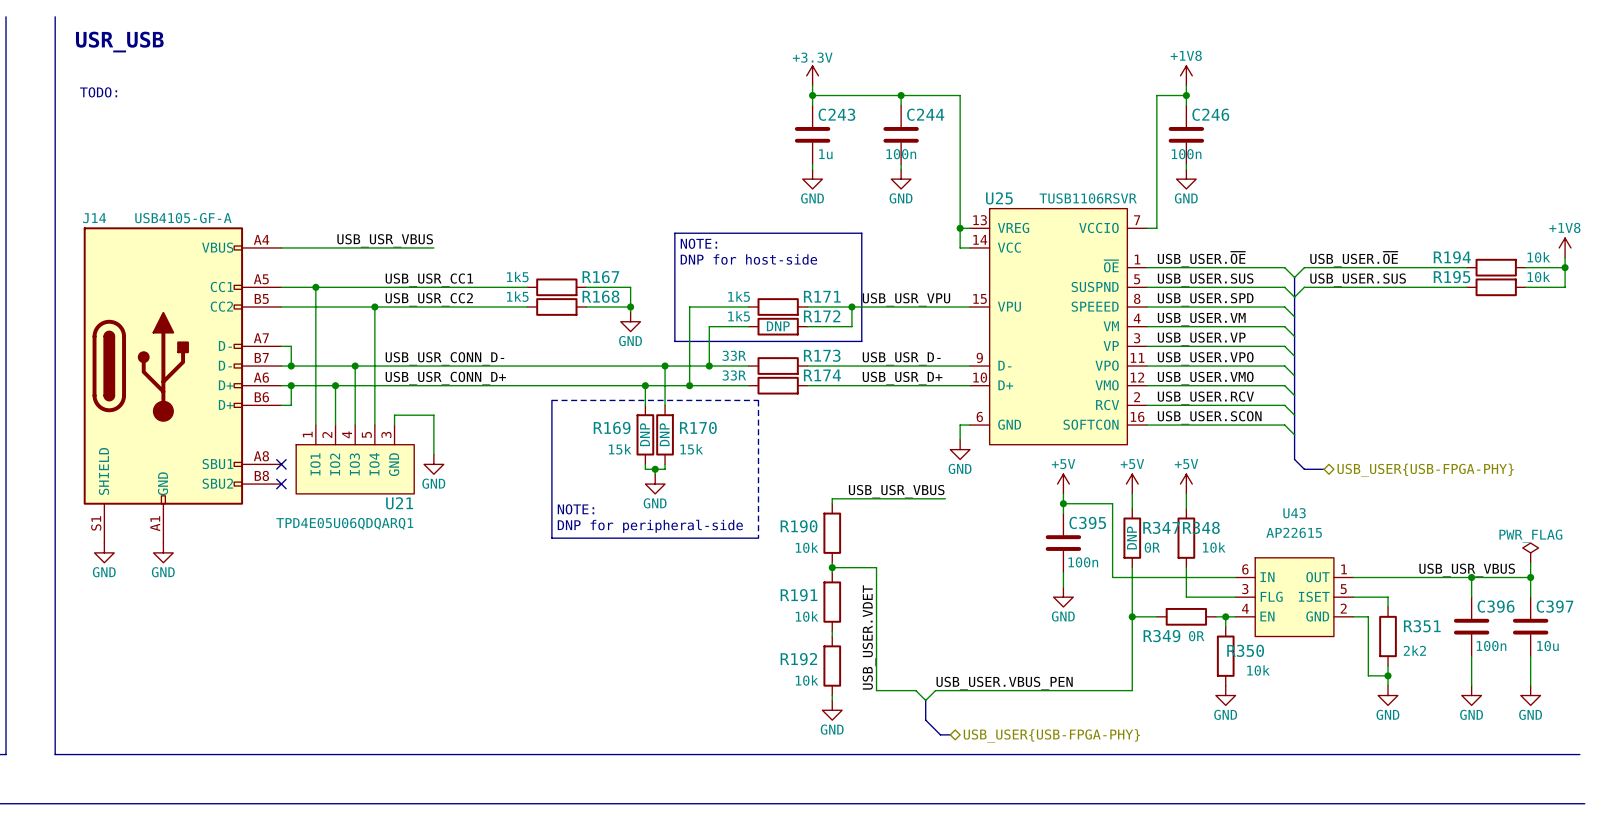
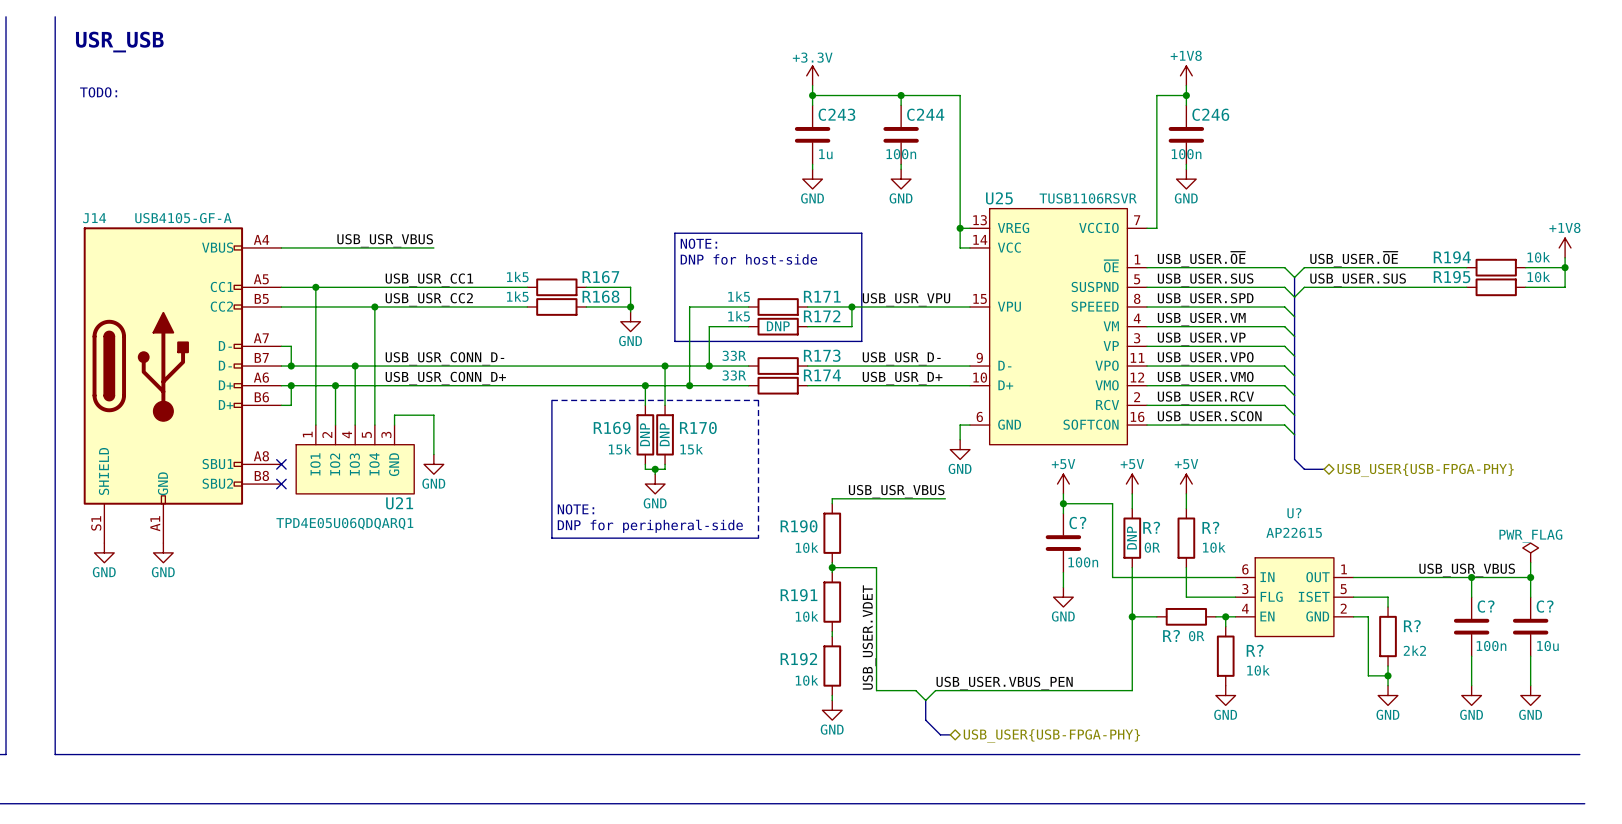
U43 name: U43 (1294, 513) -> U? (1294, 513)
C395 name: C395 (1087, 522) -> C? (1077, 522)
R347 name: R347 (1161, 527) -> R? (1151, 527)
R348 name: R348 (1201, 527) -> R? (1210, 527)
C396 name: C396 (1496, 606) -> C? (1486, 606)
C397 name: C397 (1555, 606) -> C? (1545, 606)
R351 name: R351 (1422, 626) -> R? (1412, 626)
R349 name: R349 (1161, 636) -> R? (1171, 635)
R350 name: R350 (1245, 650) -> R? (1255, 650)

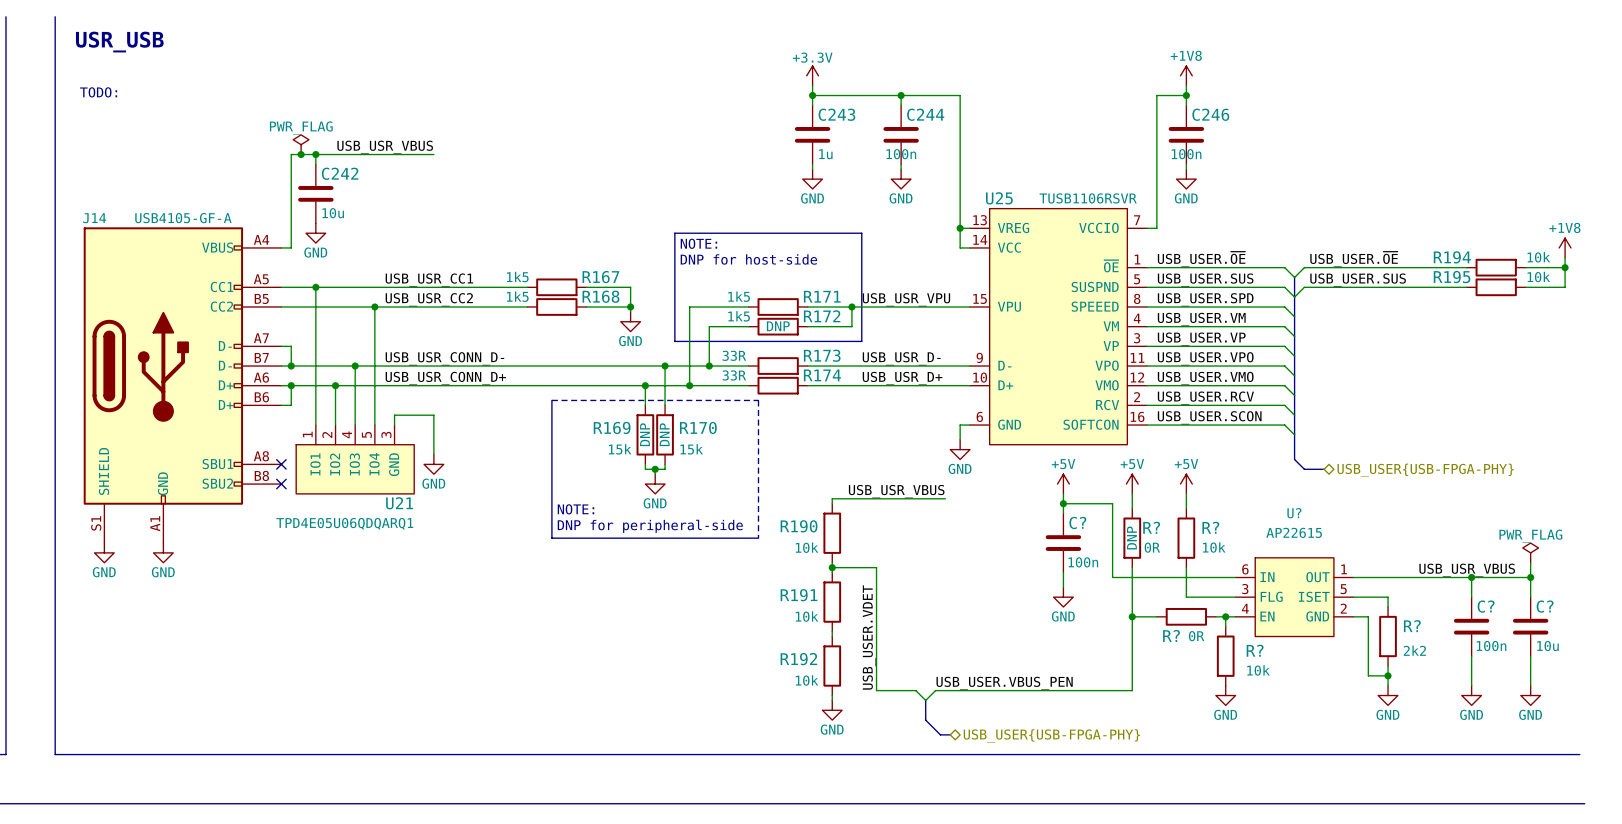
power symbol: none -> PWR_FLAG (301, 144)
junction: none -> (301, 154)
wire: none -> (315, 154) (315, 164)
junction: none -> (315, 154)
C242: none -> (315, 193)
power symbol: none -> GND (315, 233)
label position: USB_USR_VBUS (385, 240) -> USB_USR_VBUS (385, 147)
wire: (291, 247) (433, 247) -> (291, 247) (291, 154) (433, 154)

